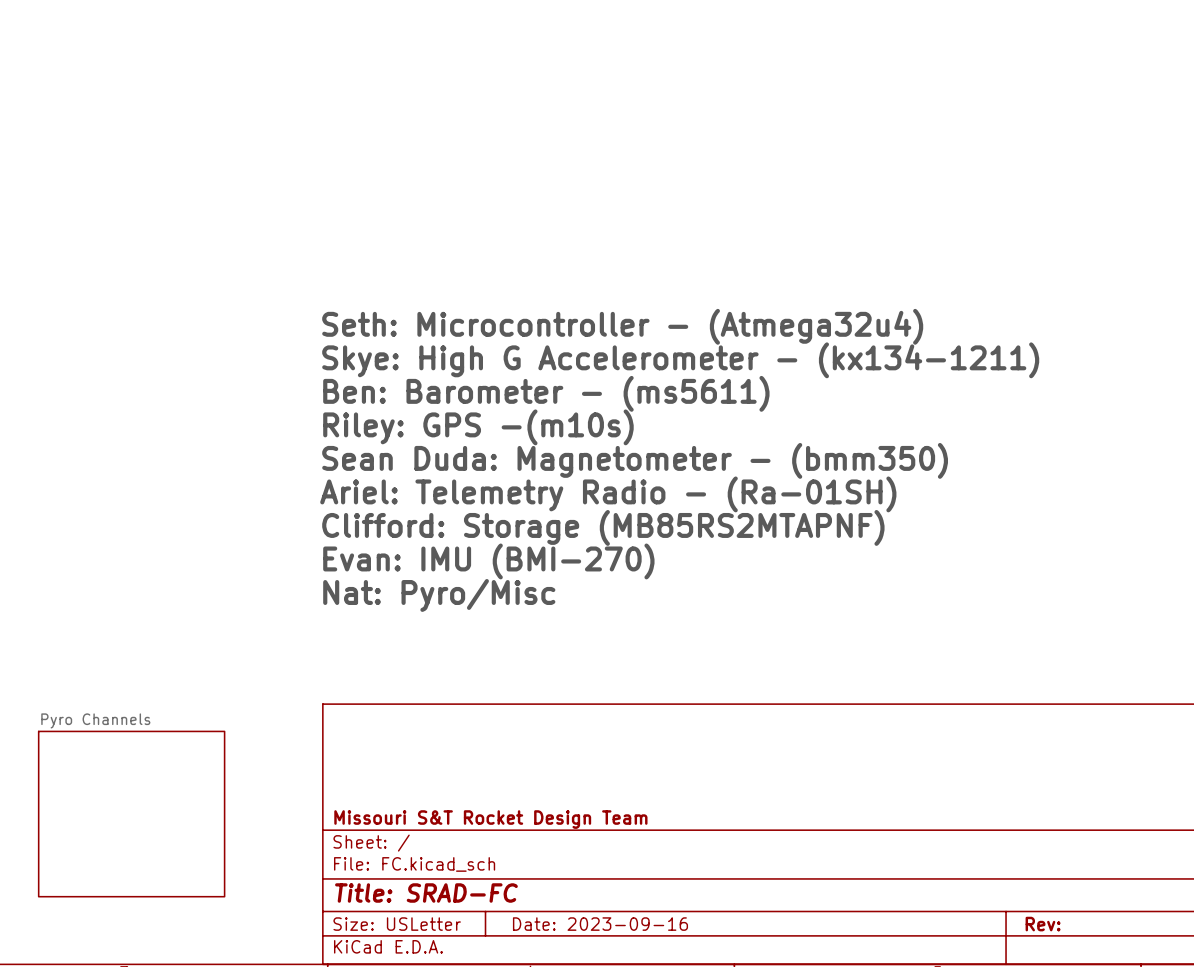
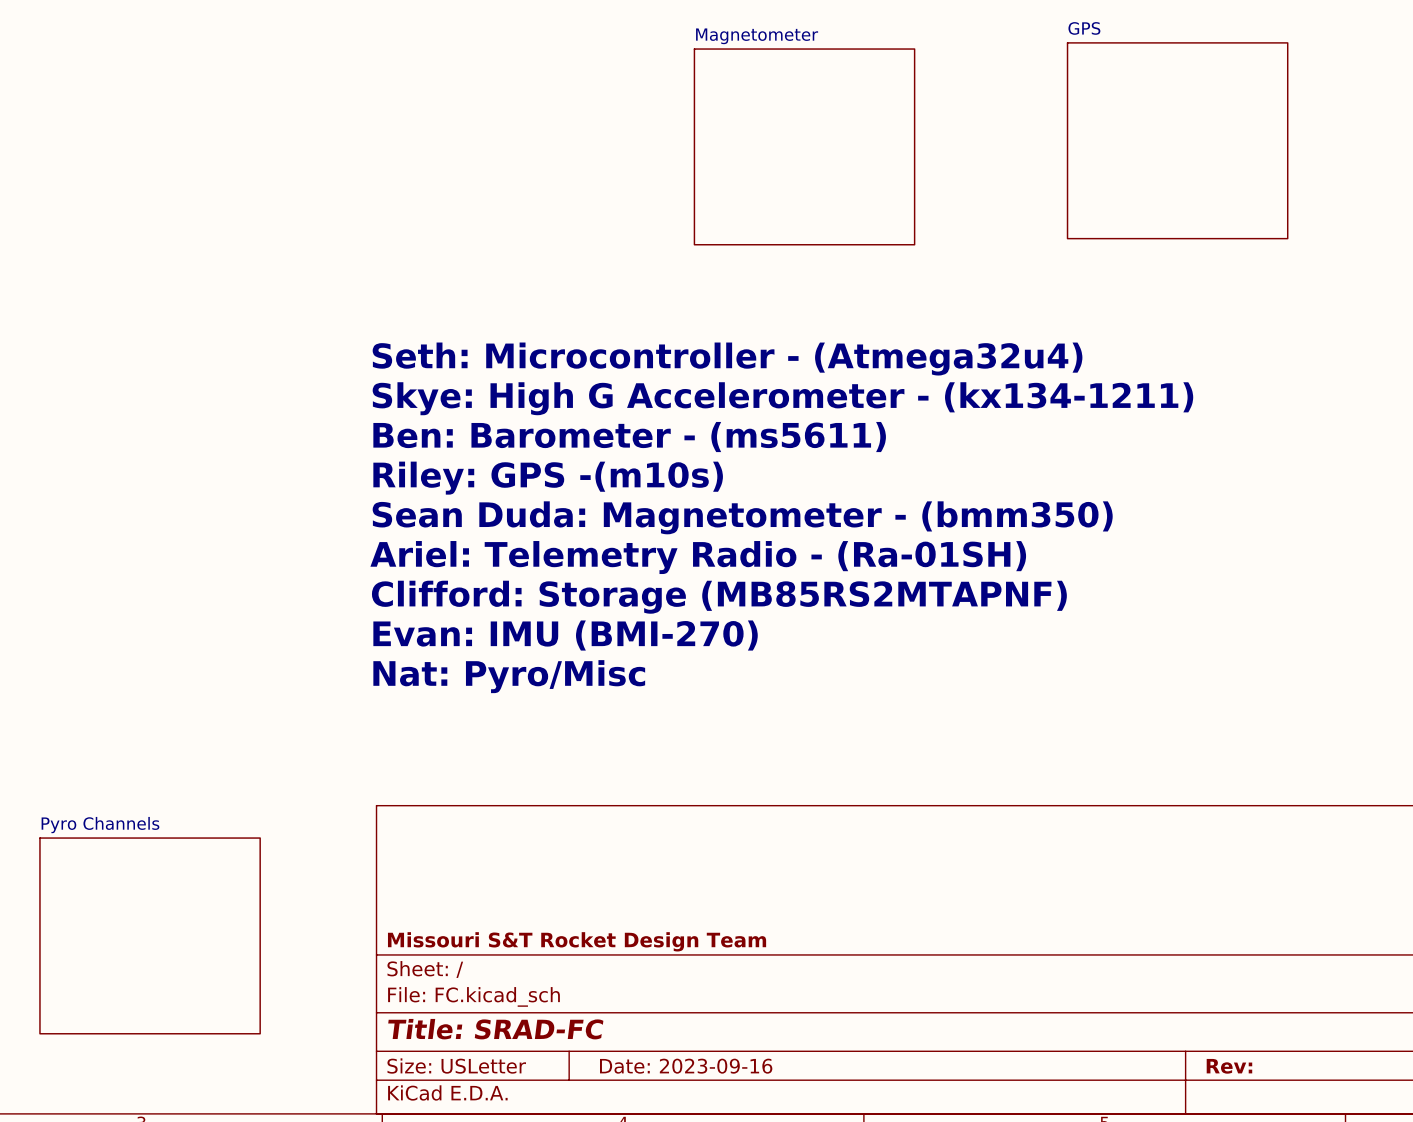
sheet GPS: none -> (1177, 140)
sheet Magnetometer: none -> (804, 146)

